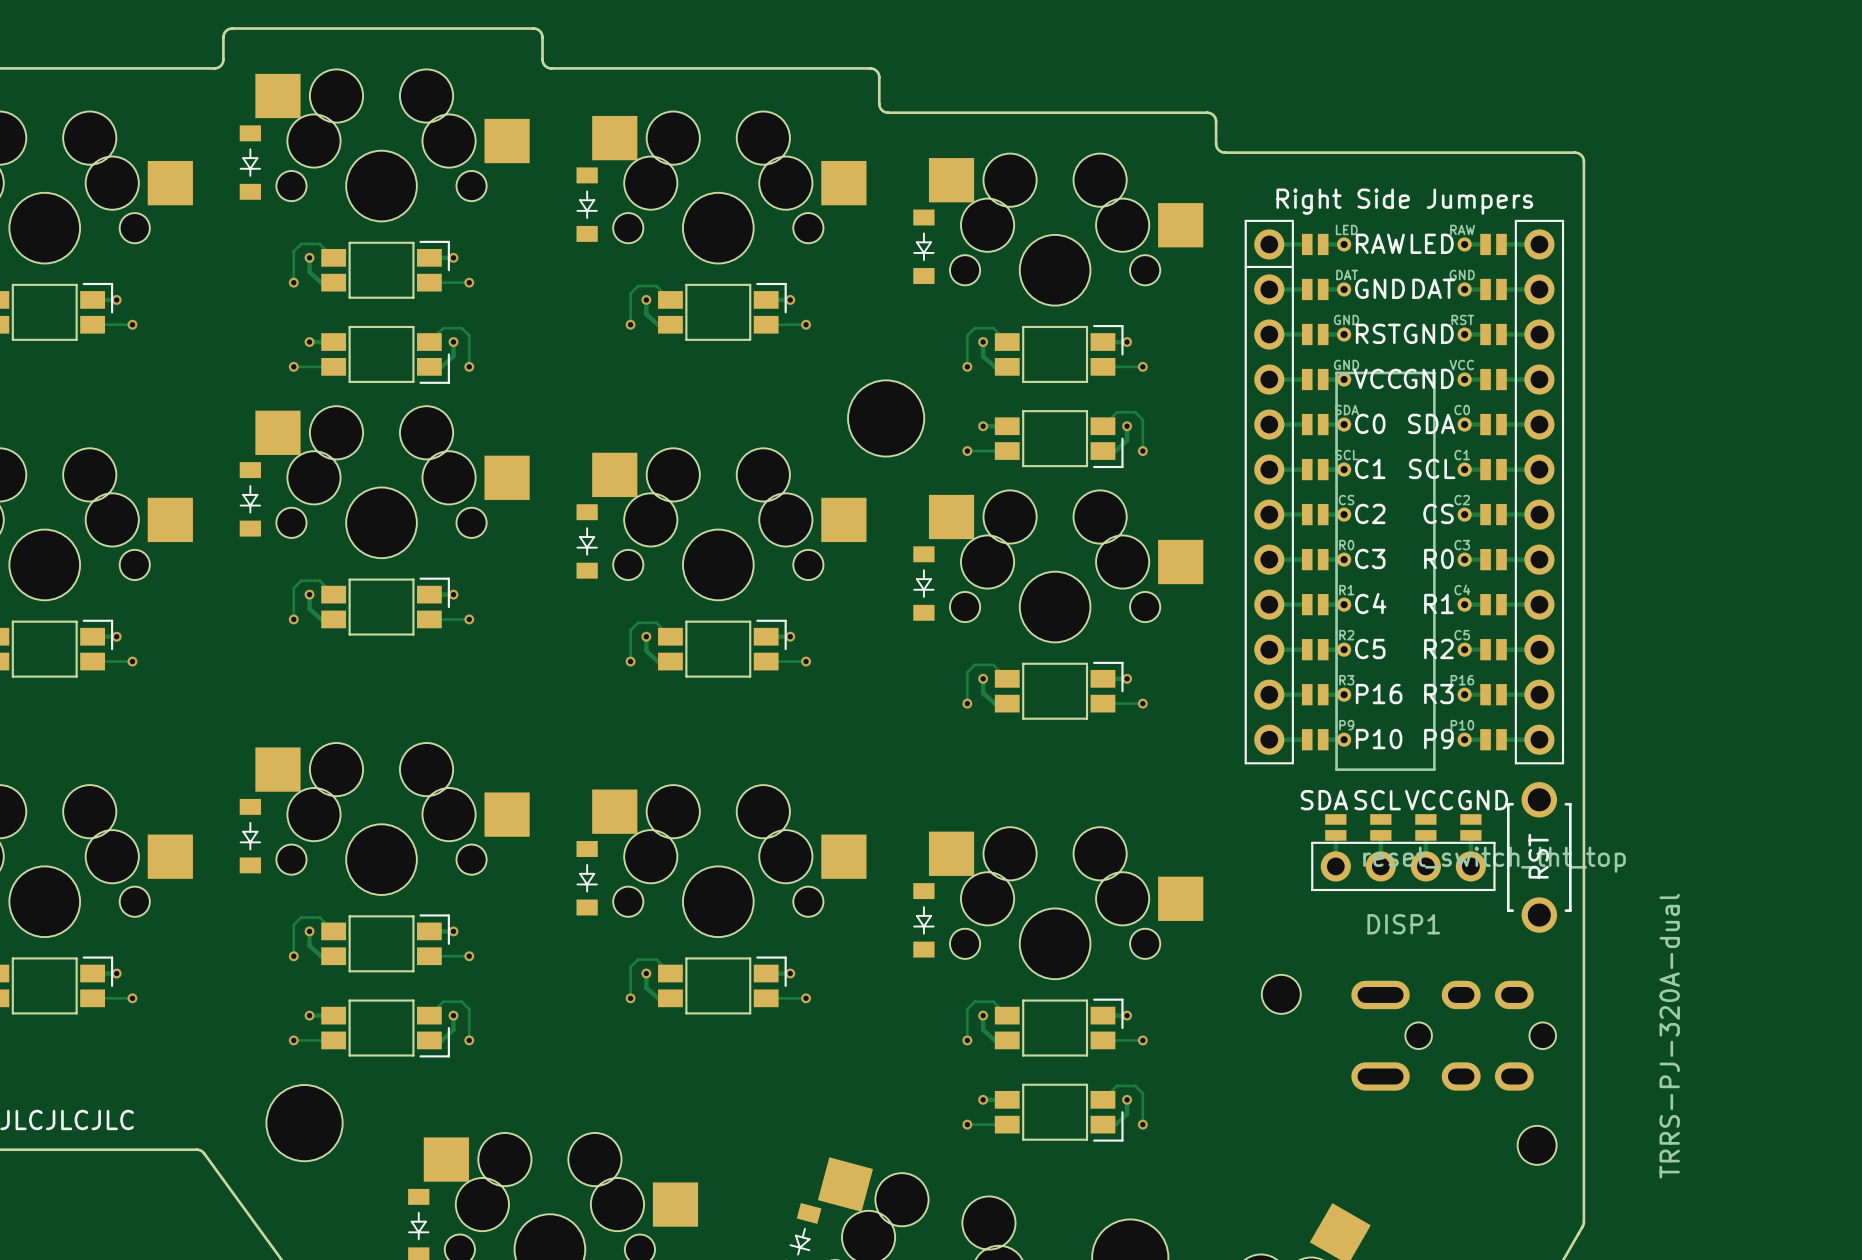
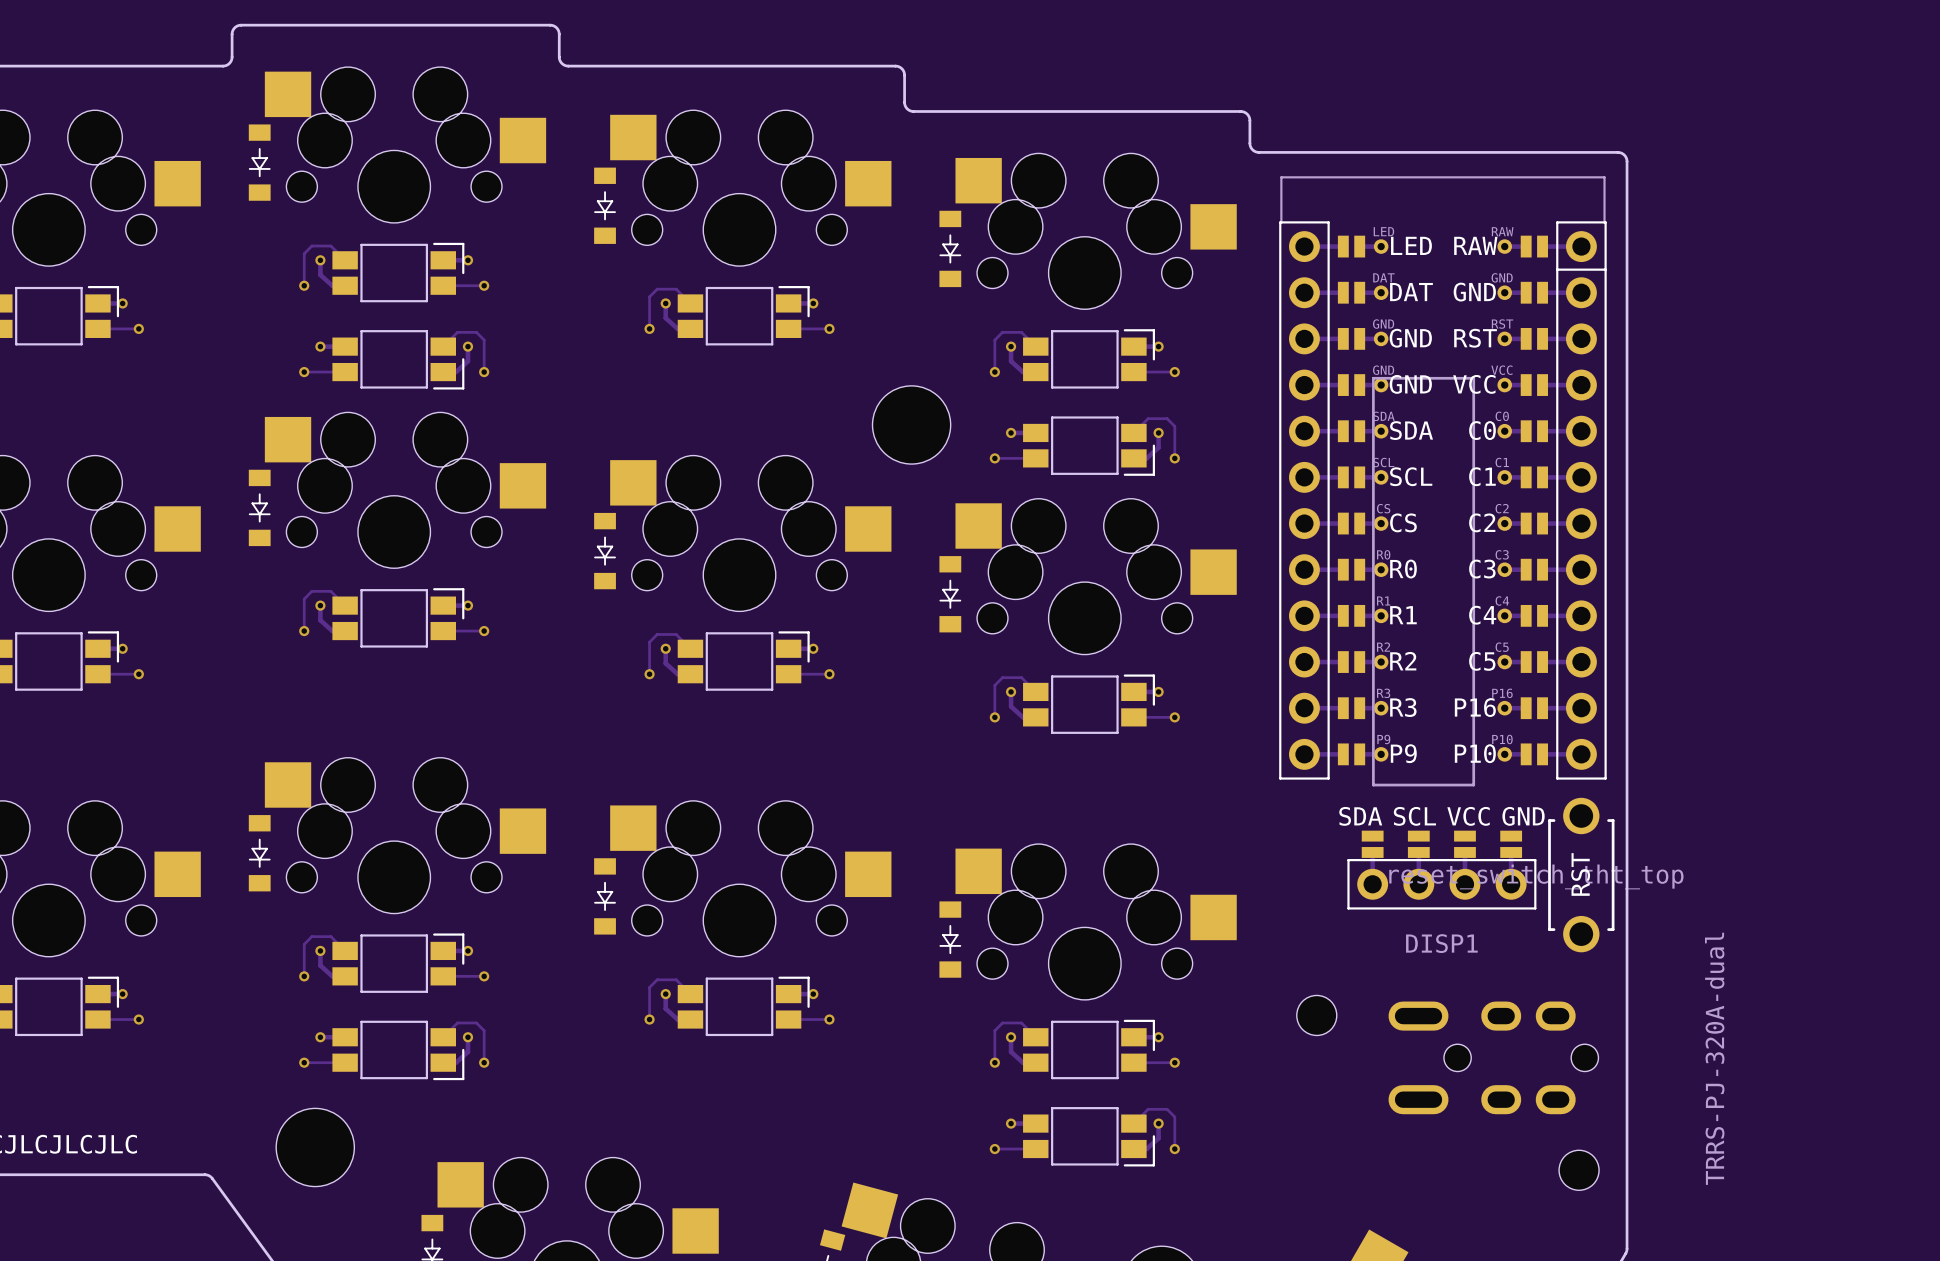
part: none -> (1442, 477)
part: (1404, 492) -> none

